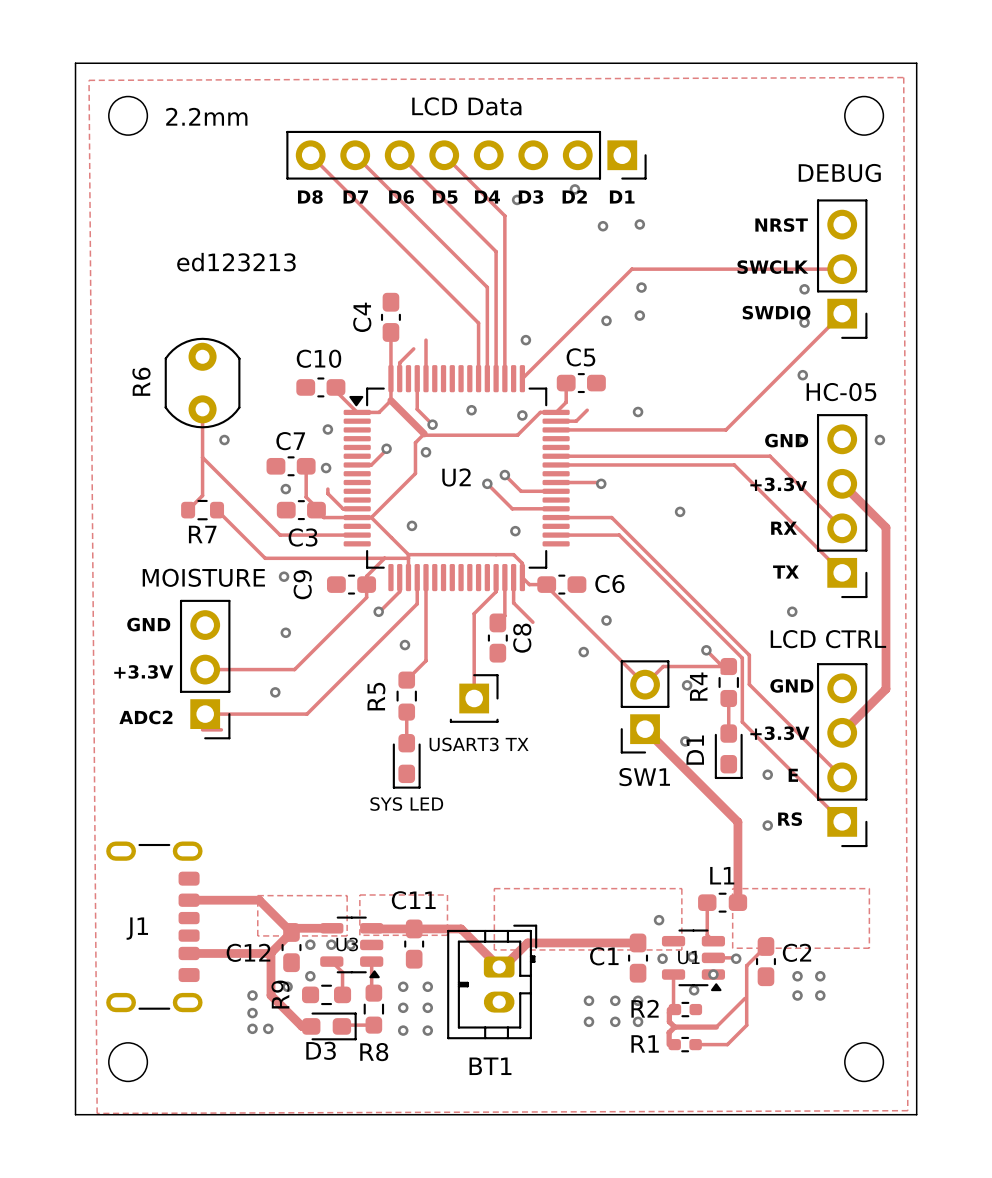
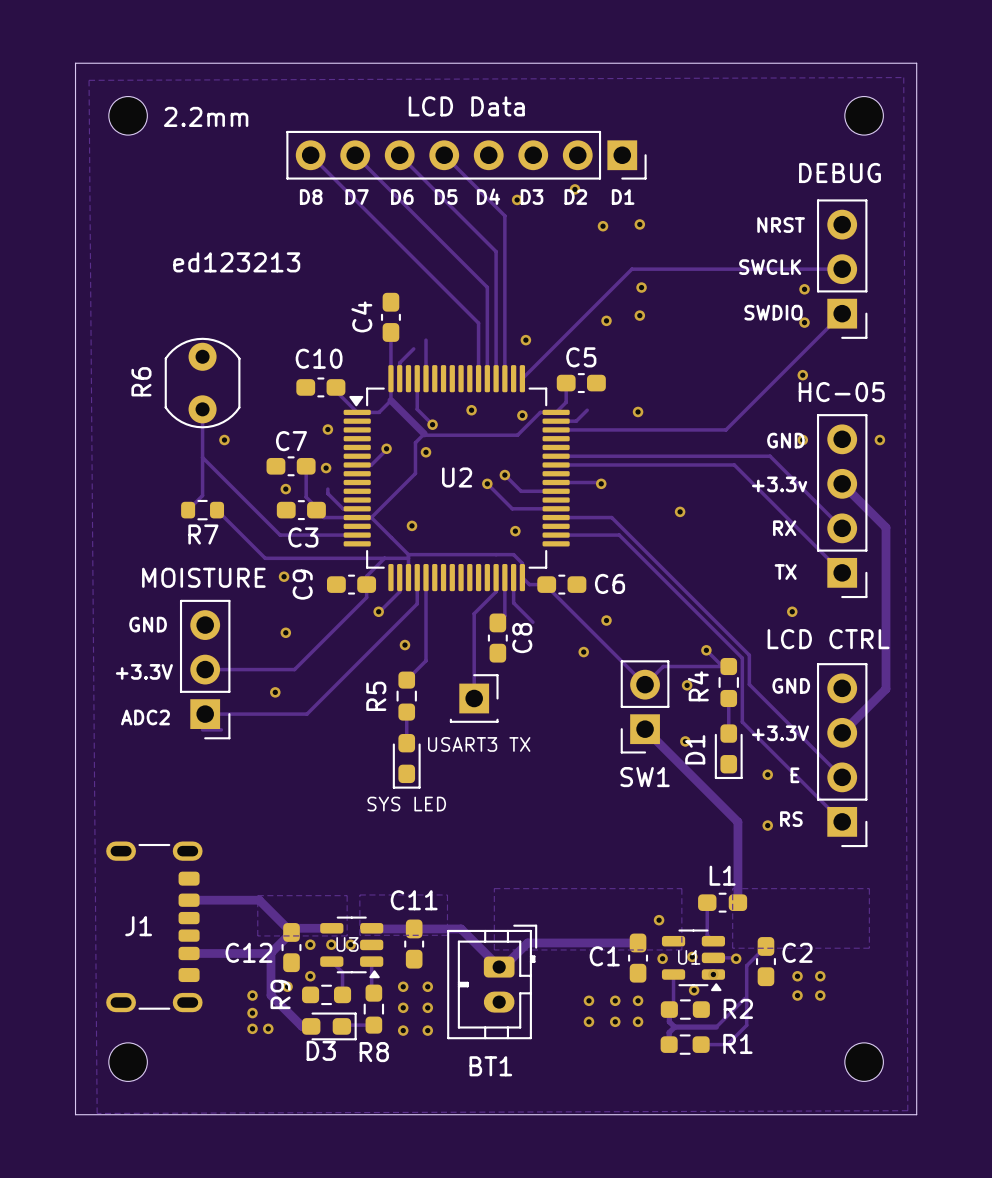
R2 footprint: [668, 1001, 703, 1018] -> [660, 999, 710, 1020]
R2 name position: R2 (645, 1008) -> R2 (738, 1008)
R1 footprint: [668, 1036, 702, 1053] -> [660, 1034, 710, 1055]
R1 name position: R1 (645, 1043) -> R1 (737, 1043)

